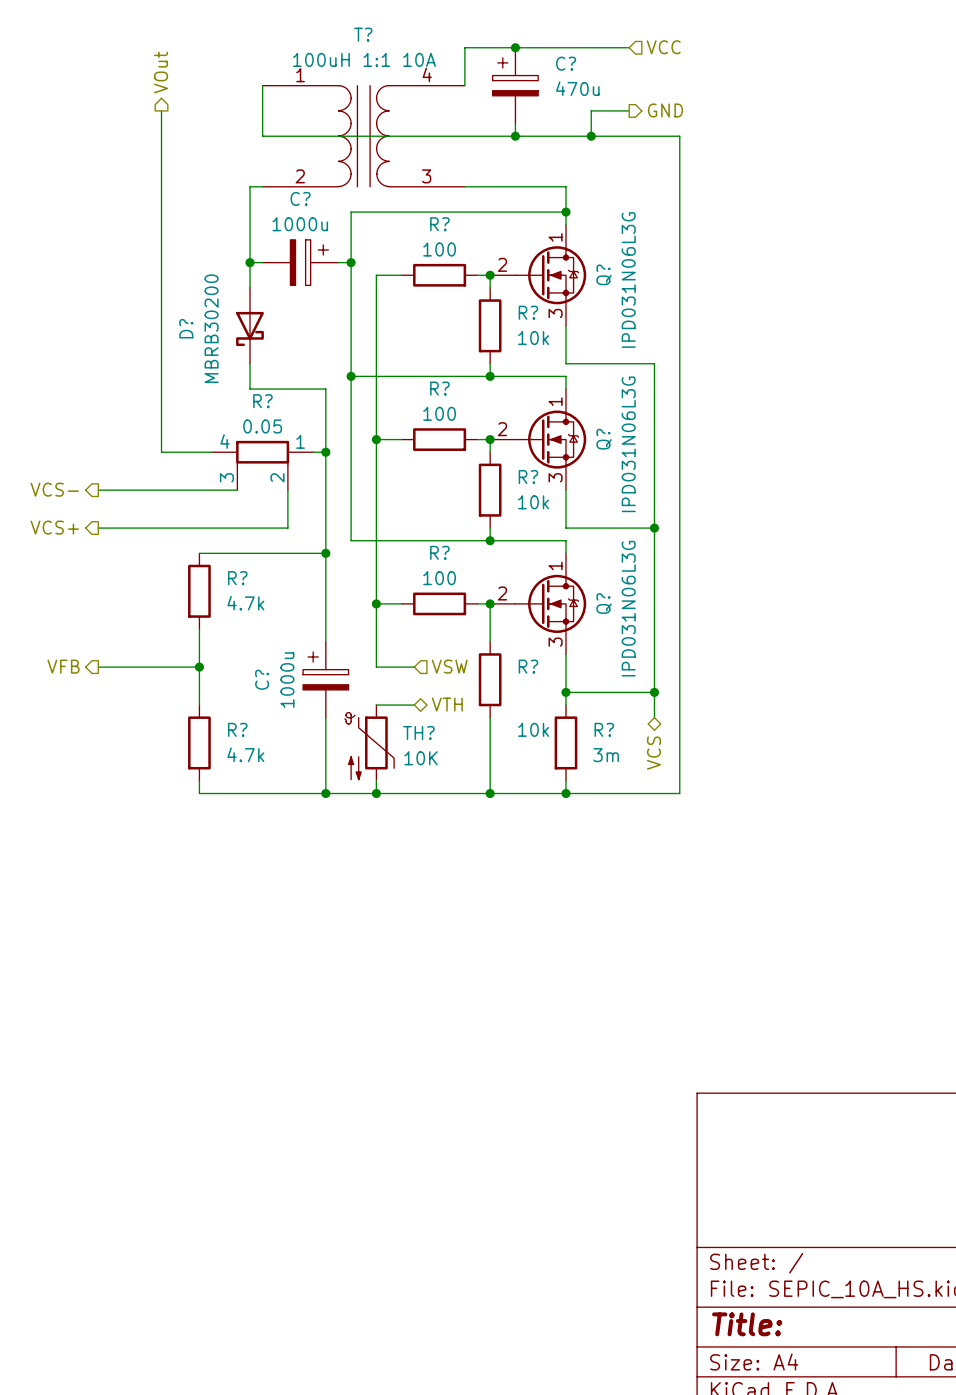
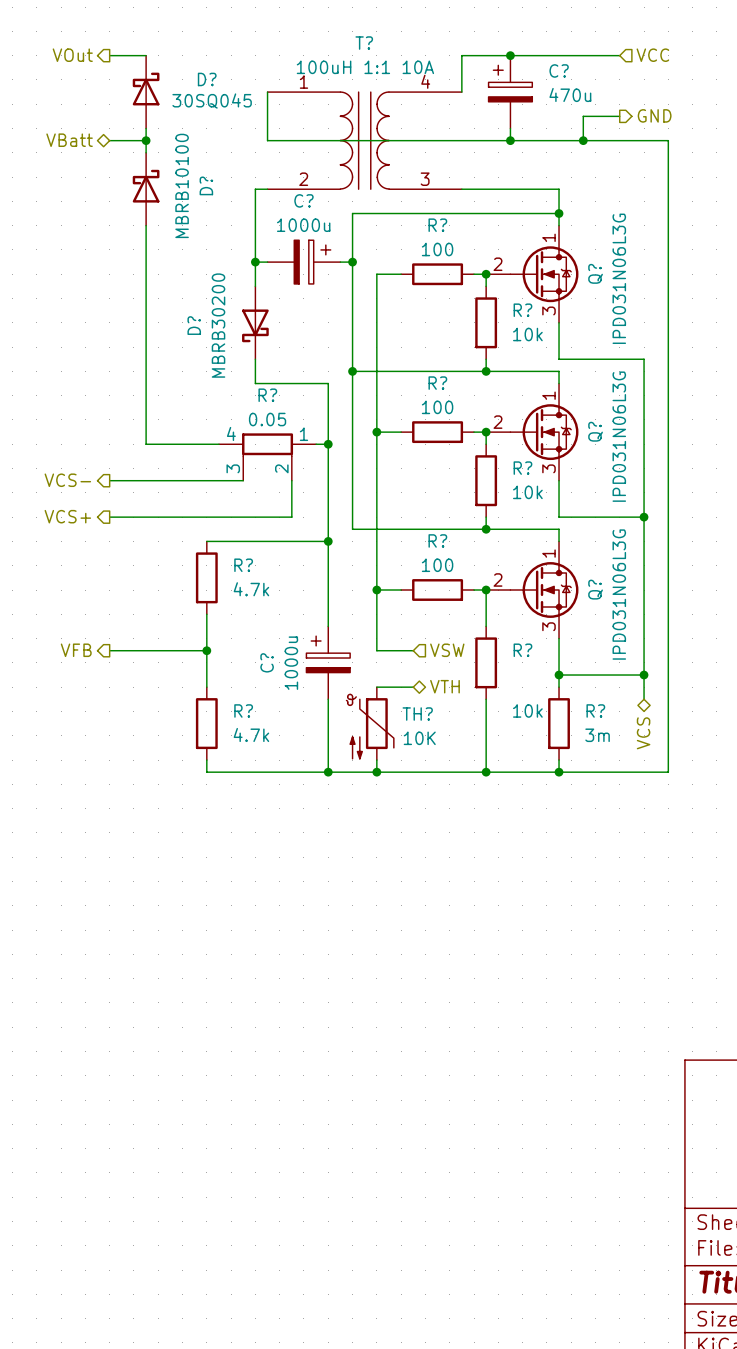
wire: none -> (109, 55) (146, 55)
hierarchical label rotation: 0° (161, 72) -> 90° counterclockwise (72, 55)
hierarchical label position: VOut (161, 72) -> VOut (72, 55)
D?: none -> 30SQ045 (146, 92)
wire: (161, 110) (161, 452) -> (146, 225) (146, 444) (170, 444)
wire: none -> (146, 128) (146, 152)
hierarchical label: none -> VBatt (69, 140)
wire: none -> (109, 140) (146, 140)
junction: none -> (146, 140)
D?: none -> MBRB10100 (146, 189)

